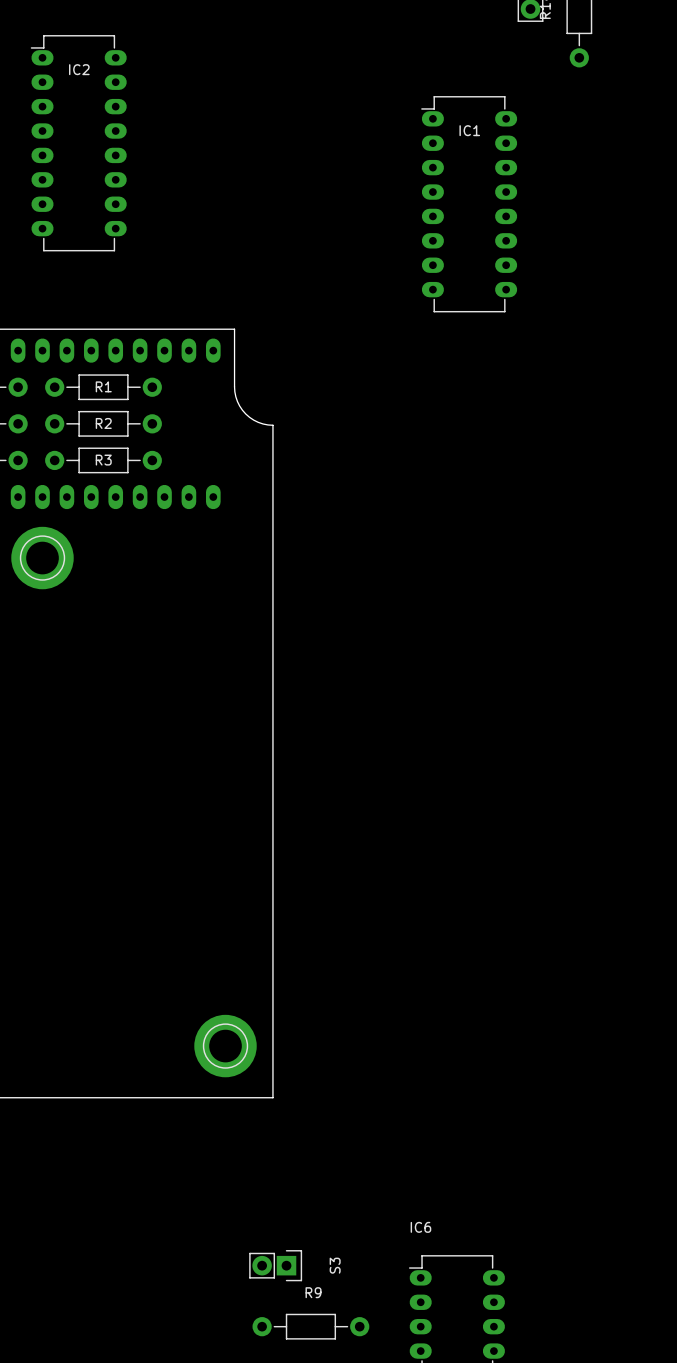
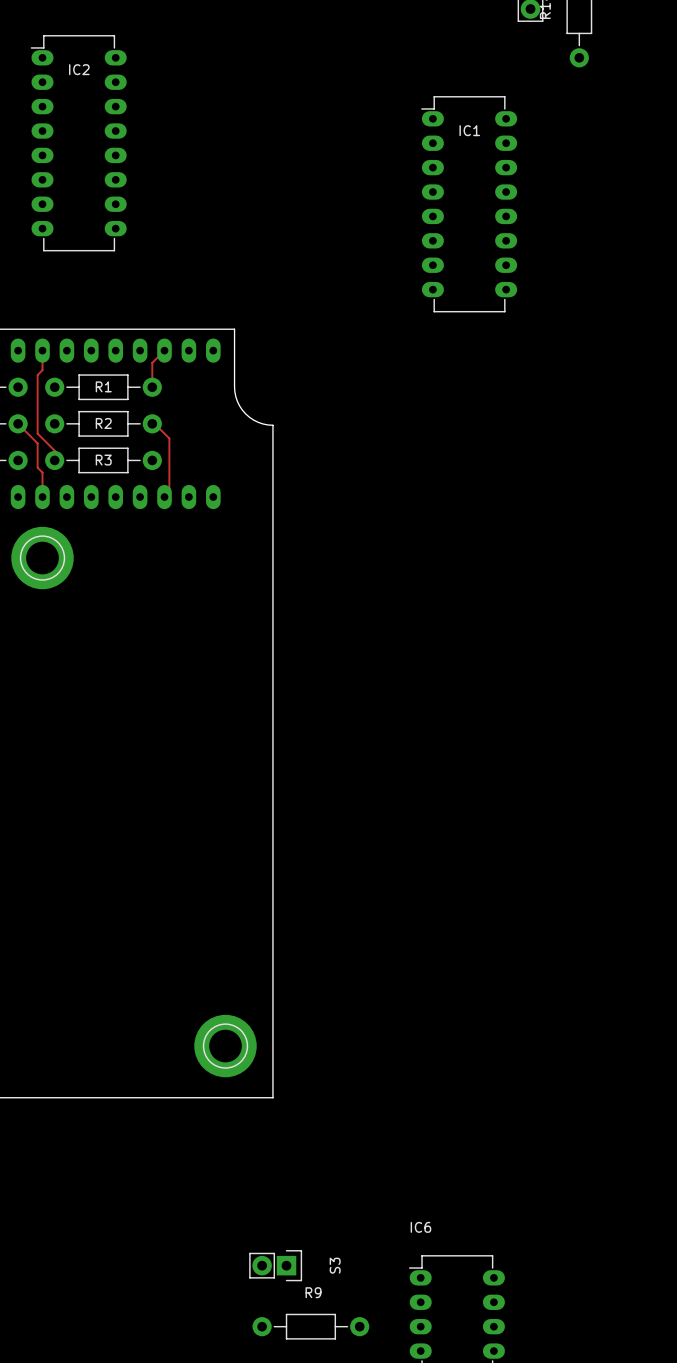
track: none -> (42, 350) (42, 370) (37, 375) (37, 433) (54, 450) (54, 460)
track: none -> (164, 350) (152, 362) (152, 387)
track: none -> (18, 423) (37, 443) (37, 467) (42, 472) (42, 497)
track: none -> (152, 423) (154, 423) (169, 438) (169, 492) (164, 497)

